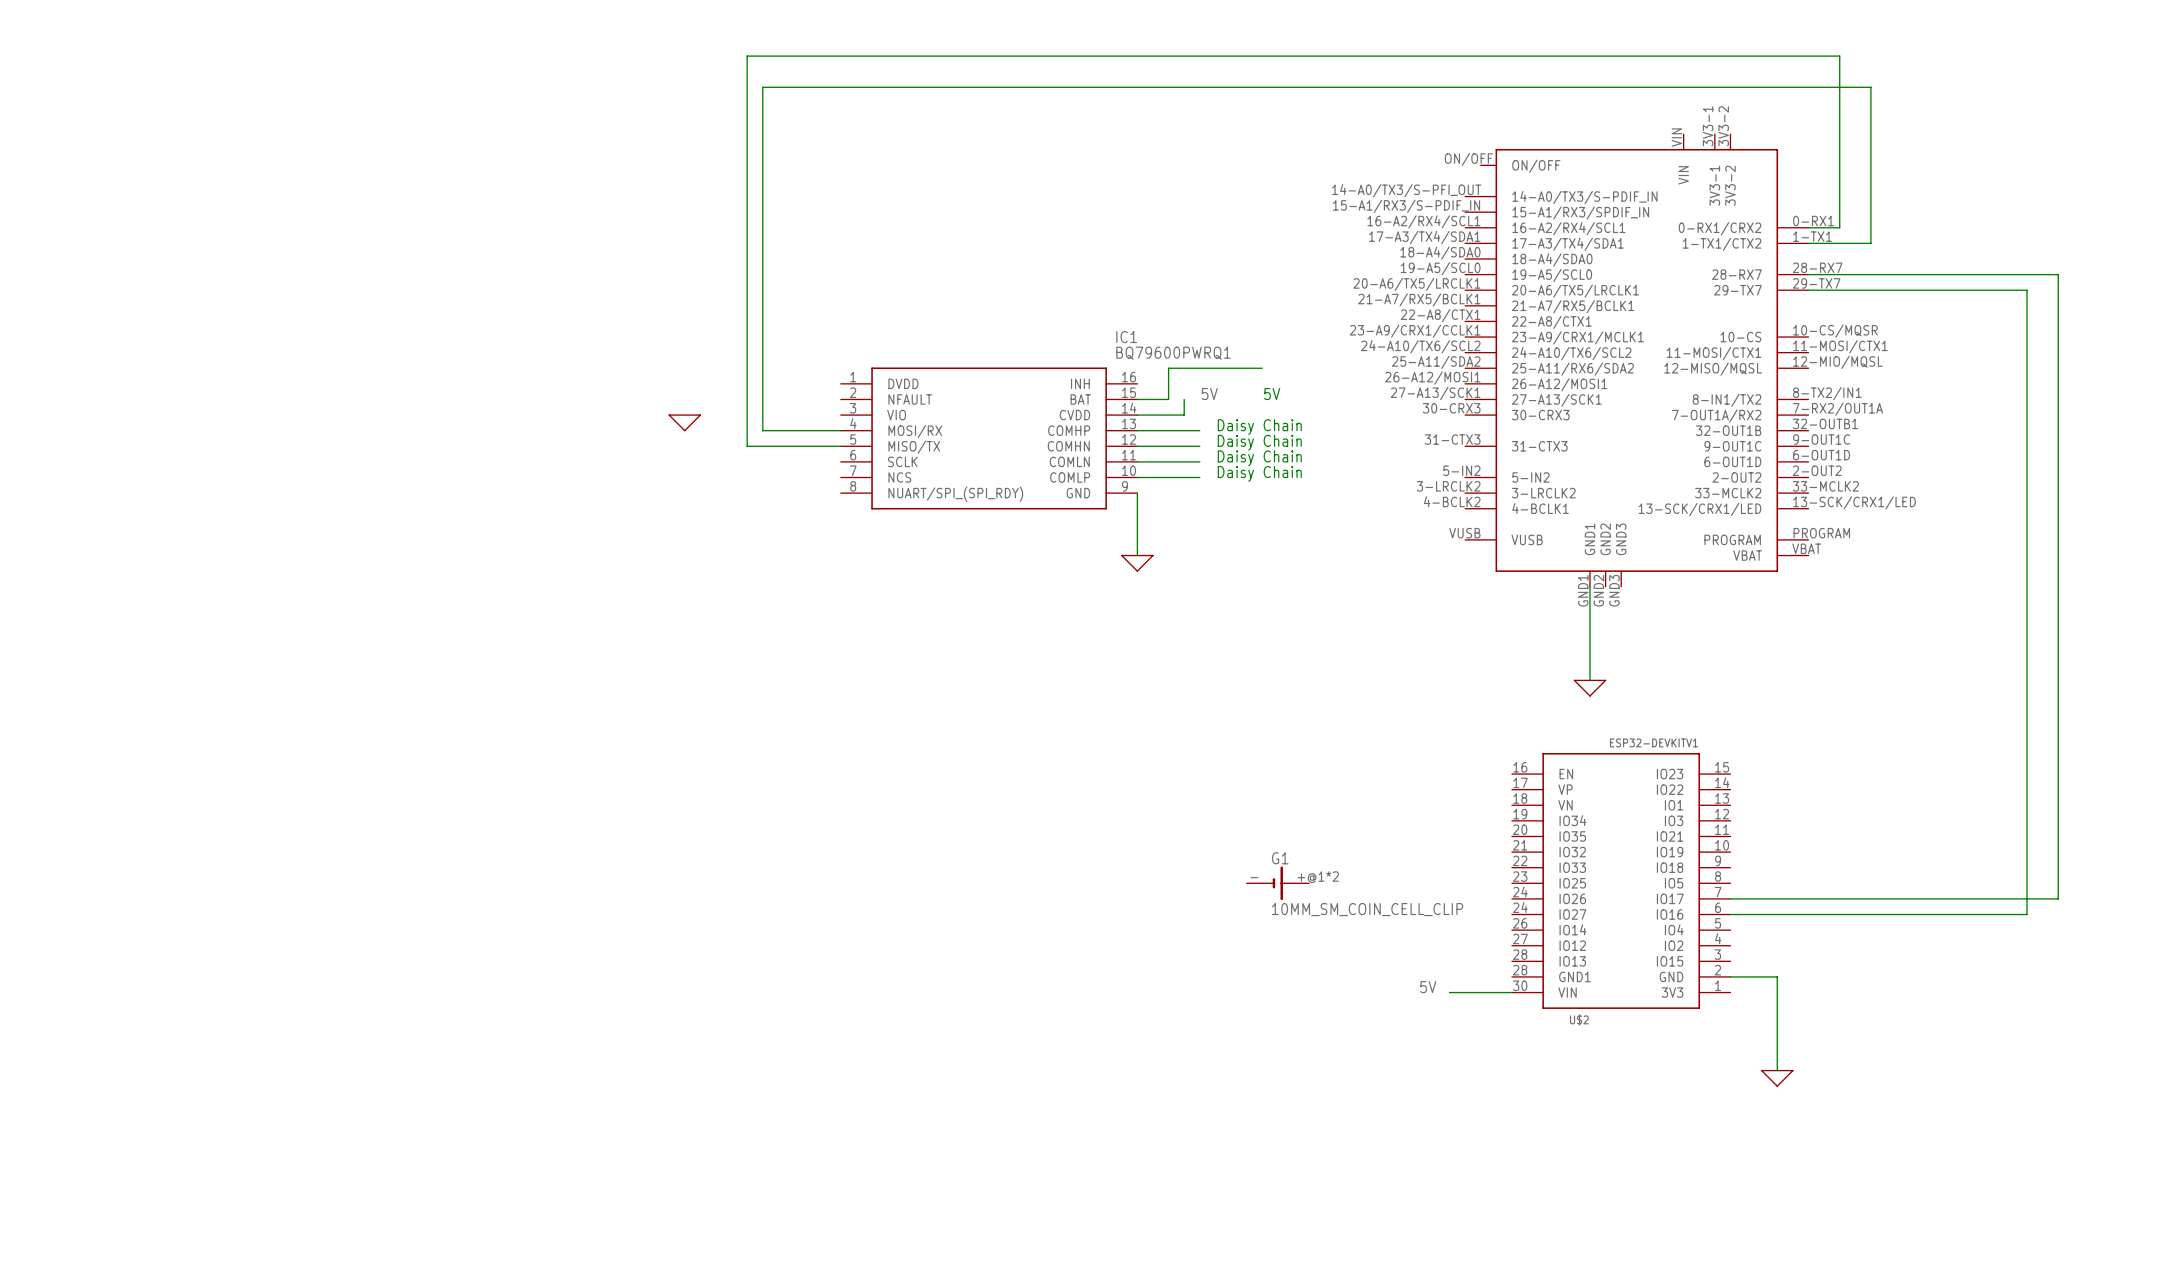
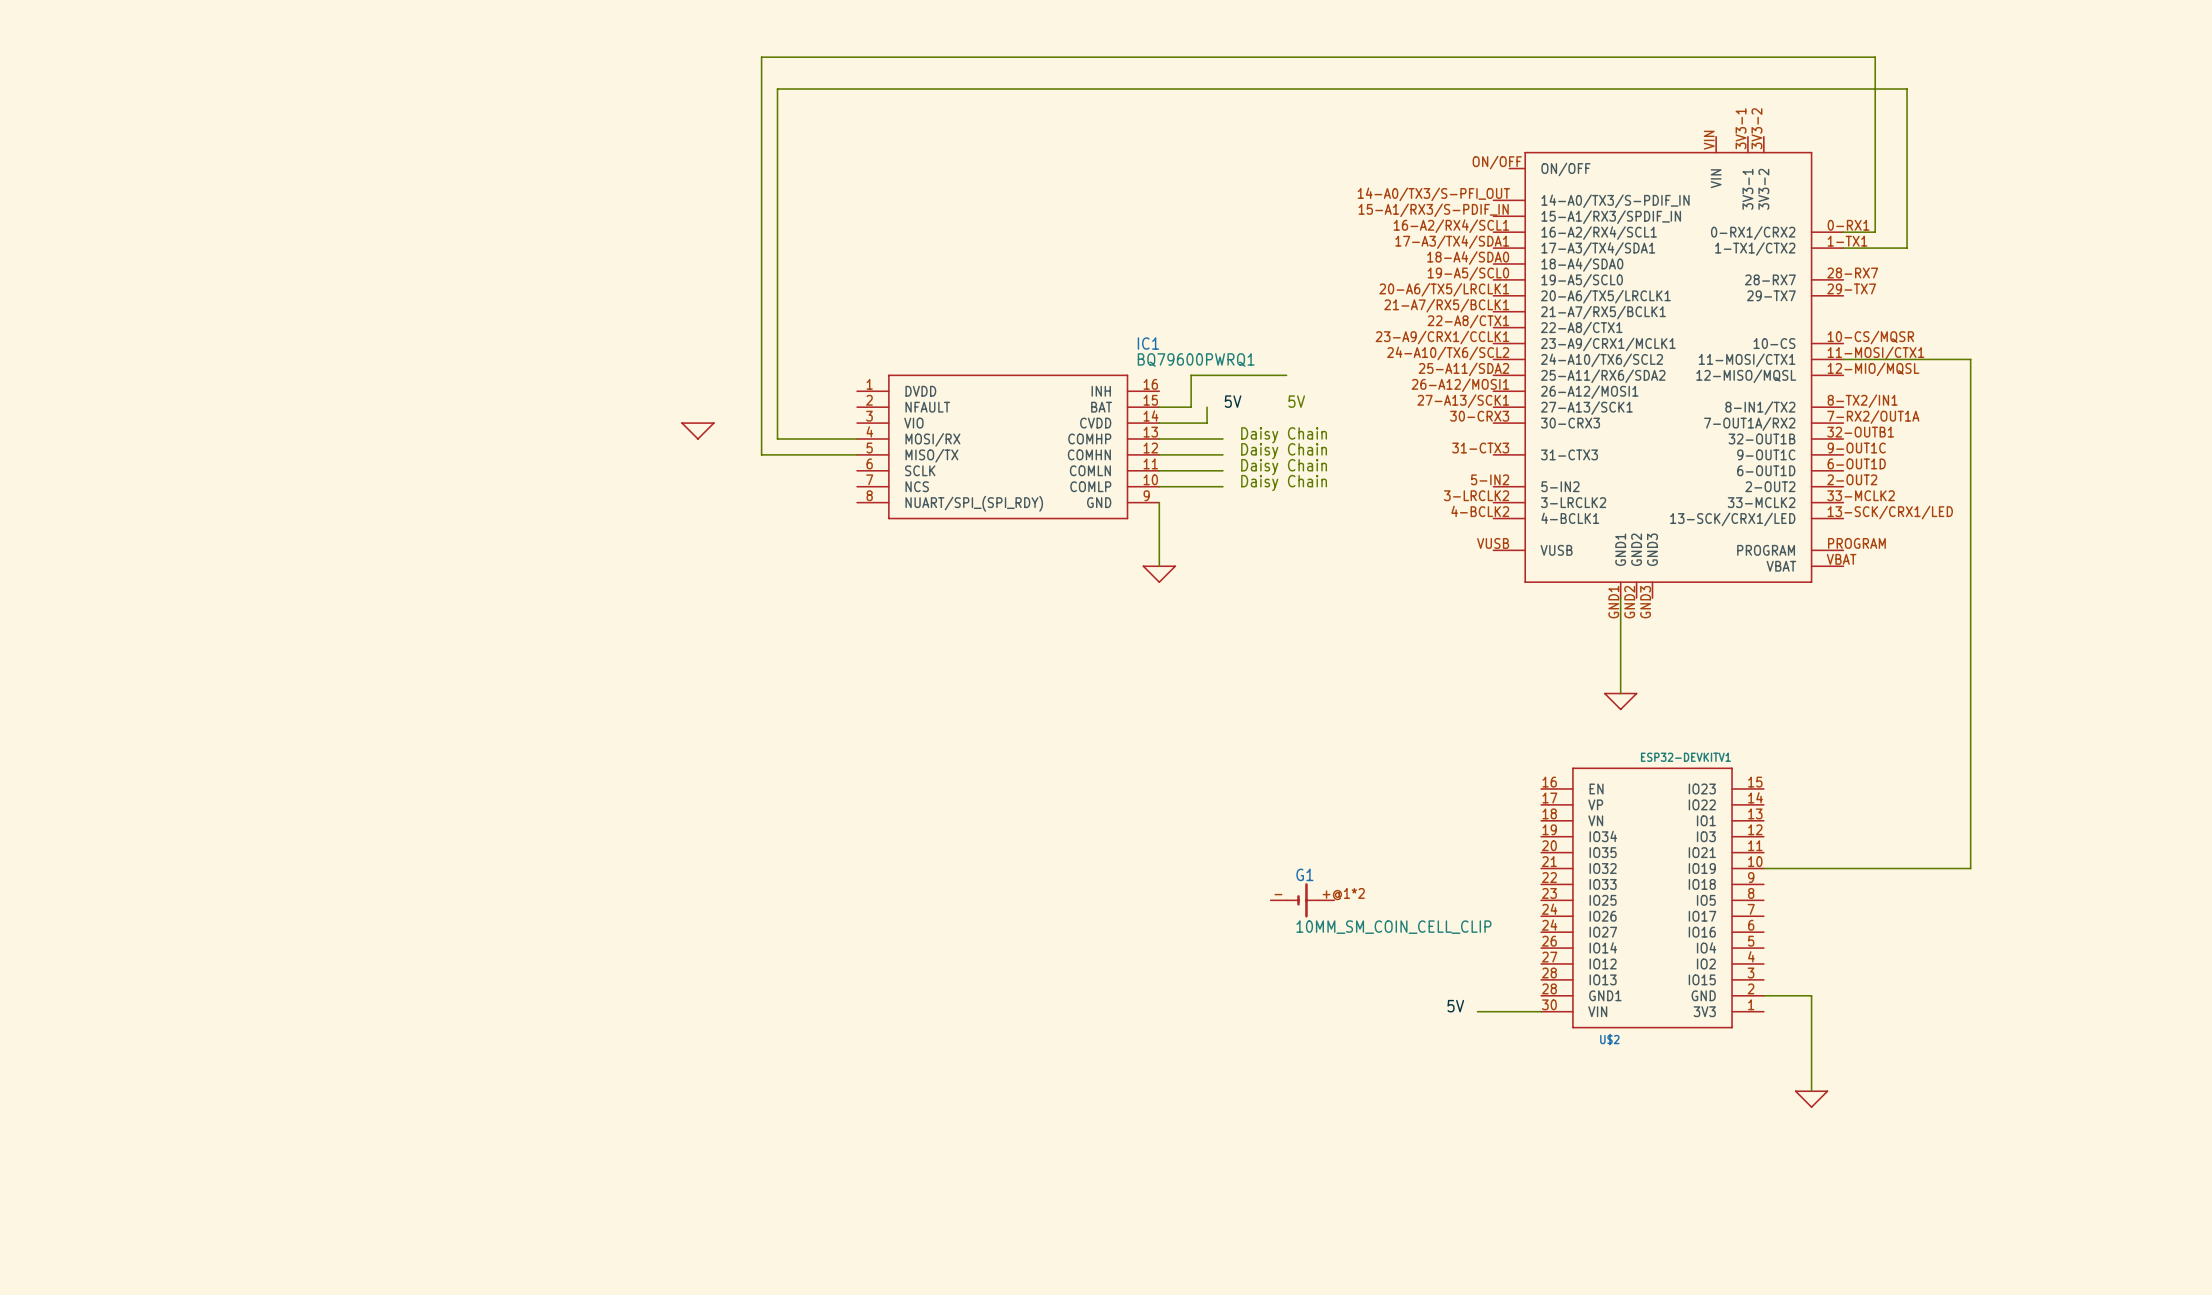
wire: (1808, 274) (2058, 274) (2058, 898) (1730, 898) -> none
wire: (1808, 290) (2027, 290) (2027, 914) (1730, 914) -> none
wire: none -> (1843, 359) (1970, 359) (1970, 868) (1763, 868)

